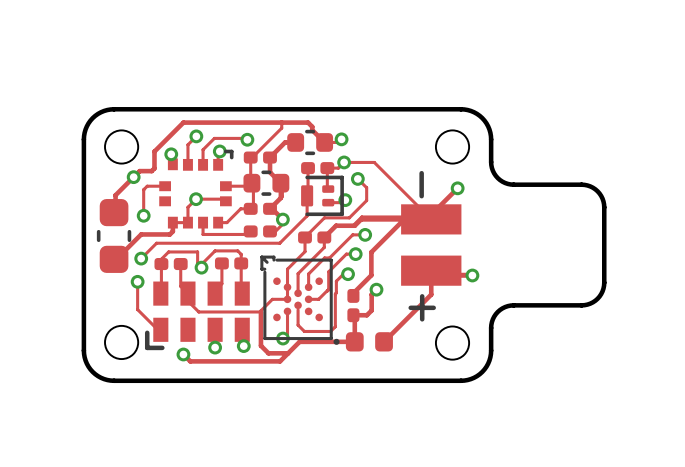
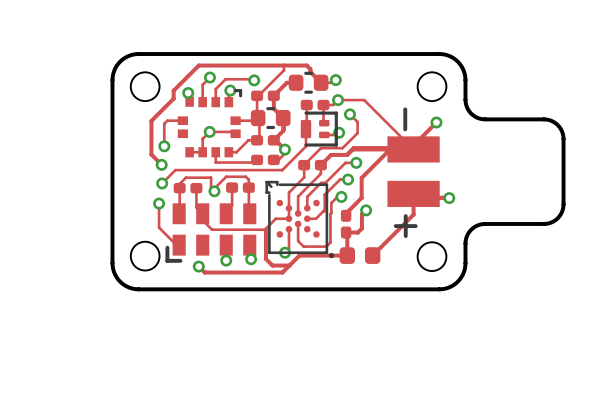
track: (154, 160) (154, 168) (151, 171) (139, 171) (115, 195) (115, 206) -> (173, 98) (151, 120) (151, 154) (161, 164)
via position: (133, 177) -> (161, 164)
track: (172, 222) (172, 231) (169, 234) (141, 234) (122, 253) (115, 253) -> none
part: (114, 235) -> none

